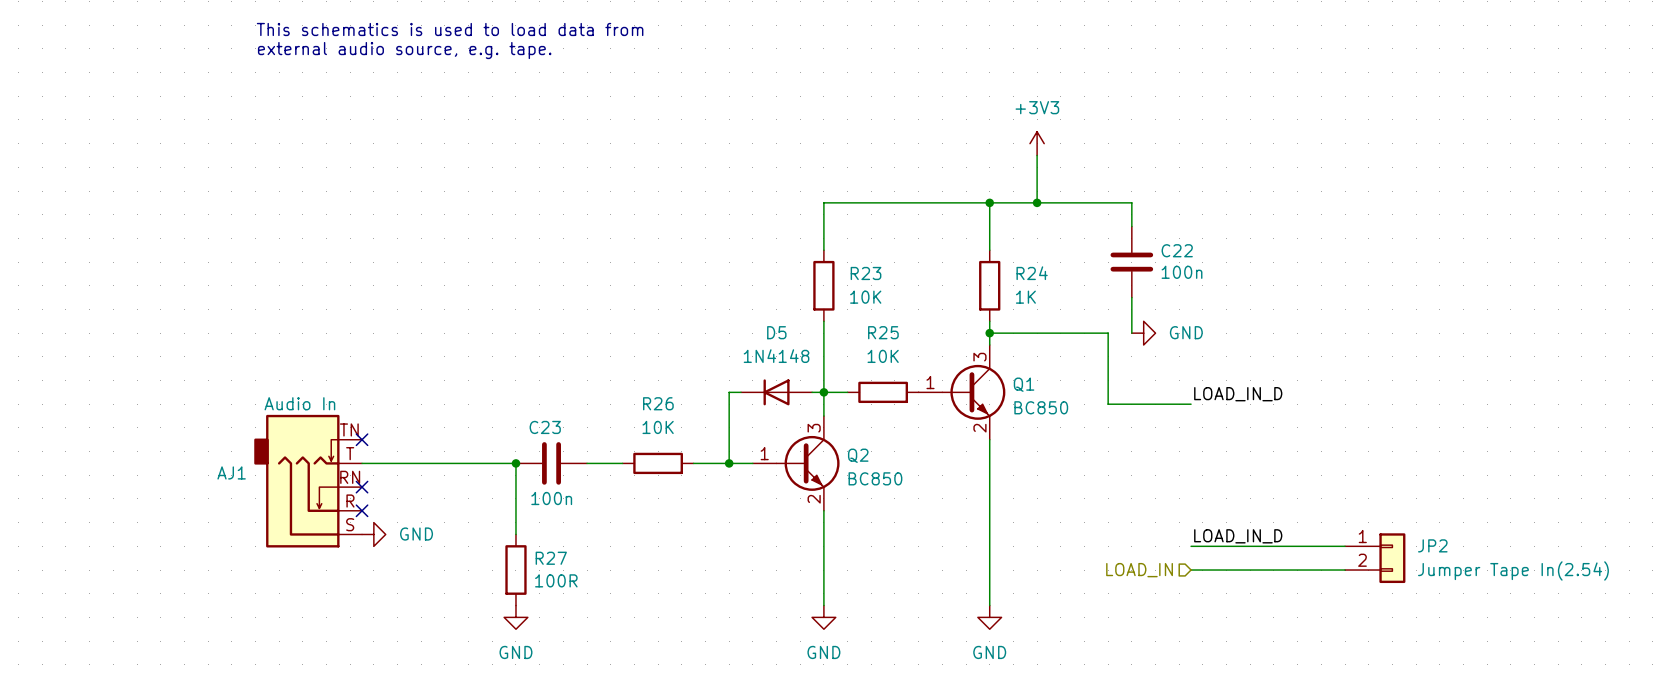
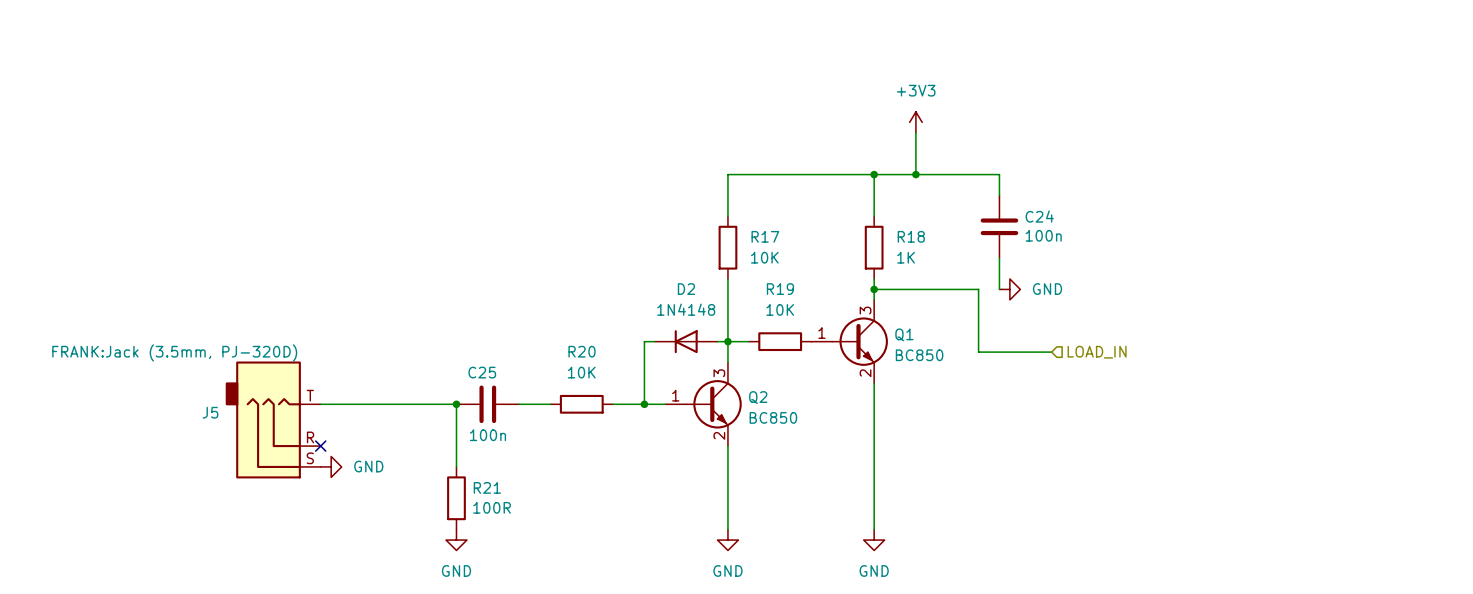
text: This schematics is used to load data from (450, 29) -> none
text: external audio source, e.g. tape. (404, 50) -> none
C22 name: C22 (1177, 250) -> C24 (1039, 216)
R23 name: R23 (866, 273) -> R17 (765, 236)
R24 name: R24 (1032, 273) -> R18 (911, 236)
D5 name: D5 (776, 332) -> D2 (686, 289)
R25 name: R25 (883, 332) -> R19 (780, 289)
label: LOAD_IN_D (1238, 394) -> none
R26 name: R26 (658, 403) -> R20 (582, 351)
C23 name: C23 (545, 427) -> C25 (482, 372)
no-connect mark: (362, 439) -> none
AJ1: Audio In (308, 481) -> none
J5: none -> FRANK:Jack (3.5mm, PJ-320D) (273, 419)
no-connect mark: (362, 487) -> none
label: LOAD_IN_D (1238, 536) -> none
wire: (1191, 546) (1345, 546) -> none
R27 name: R27 (551, 558) -> R21 (487, 487)
JP2: Jumper Tape In(2.54) (1375, 558) -> none
hierarchical label rotation: 0° (1139, 570) -> 180° (1097, 352)
hierarchical label position: LOAD_IN (1139, 570) -> LOAD_IN (1097, 352)
wire: (1191, 570) (1345, 570) -> none

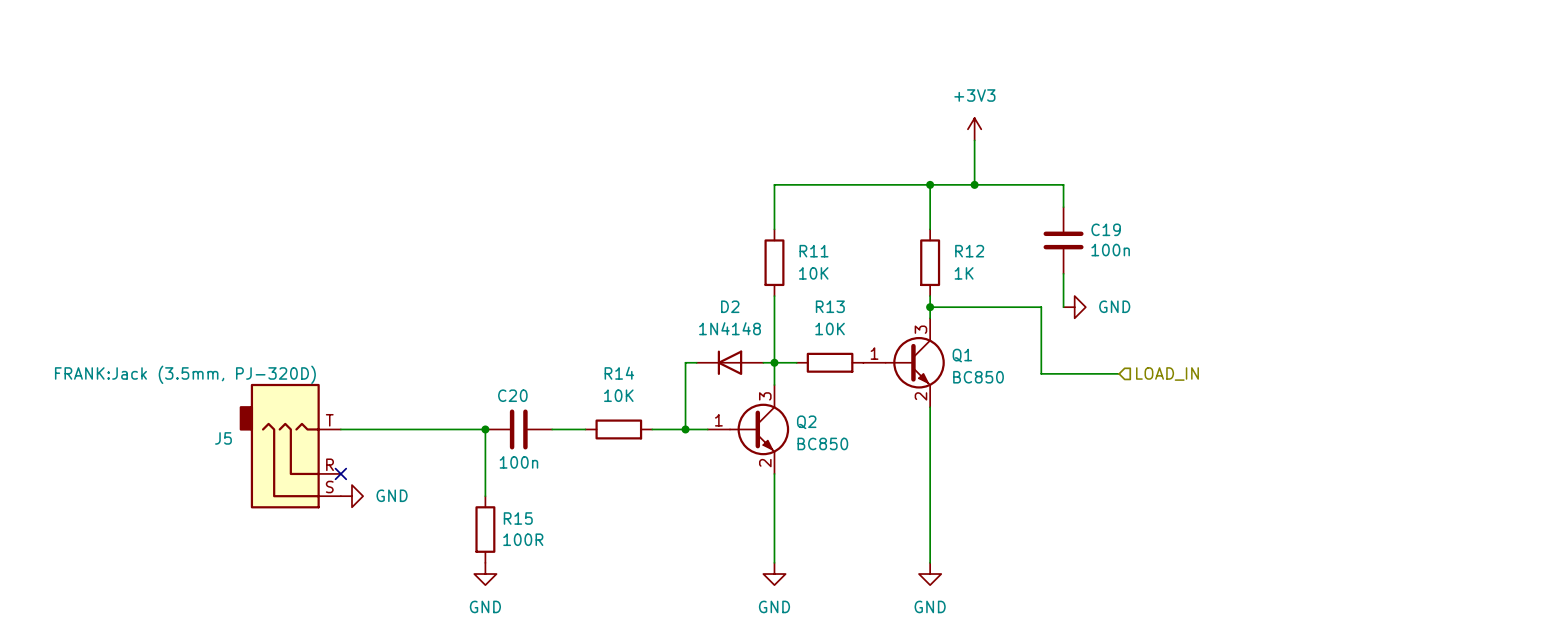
C24 name: C24 (1039, 216) -> C19 (1106, 229)
R17 name: R17 (765, 236) -> R11 (814, 251)
R18 name: R18 (911, 236) -> R12 (969, 251)
R19 name: R19 (780, 289) -> R13 (830, 306)
R20 name: R20 (582, 351) -> R14 (619, 373)
C25 name: C25 (482, 372) -> C20 (512, 395)
R21 name: R21 (487, 487) -> R15 (518, 518)

